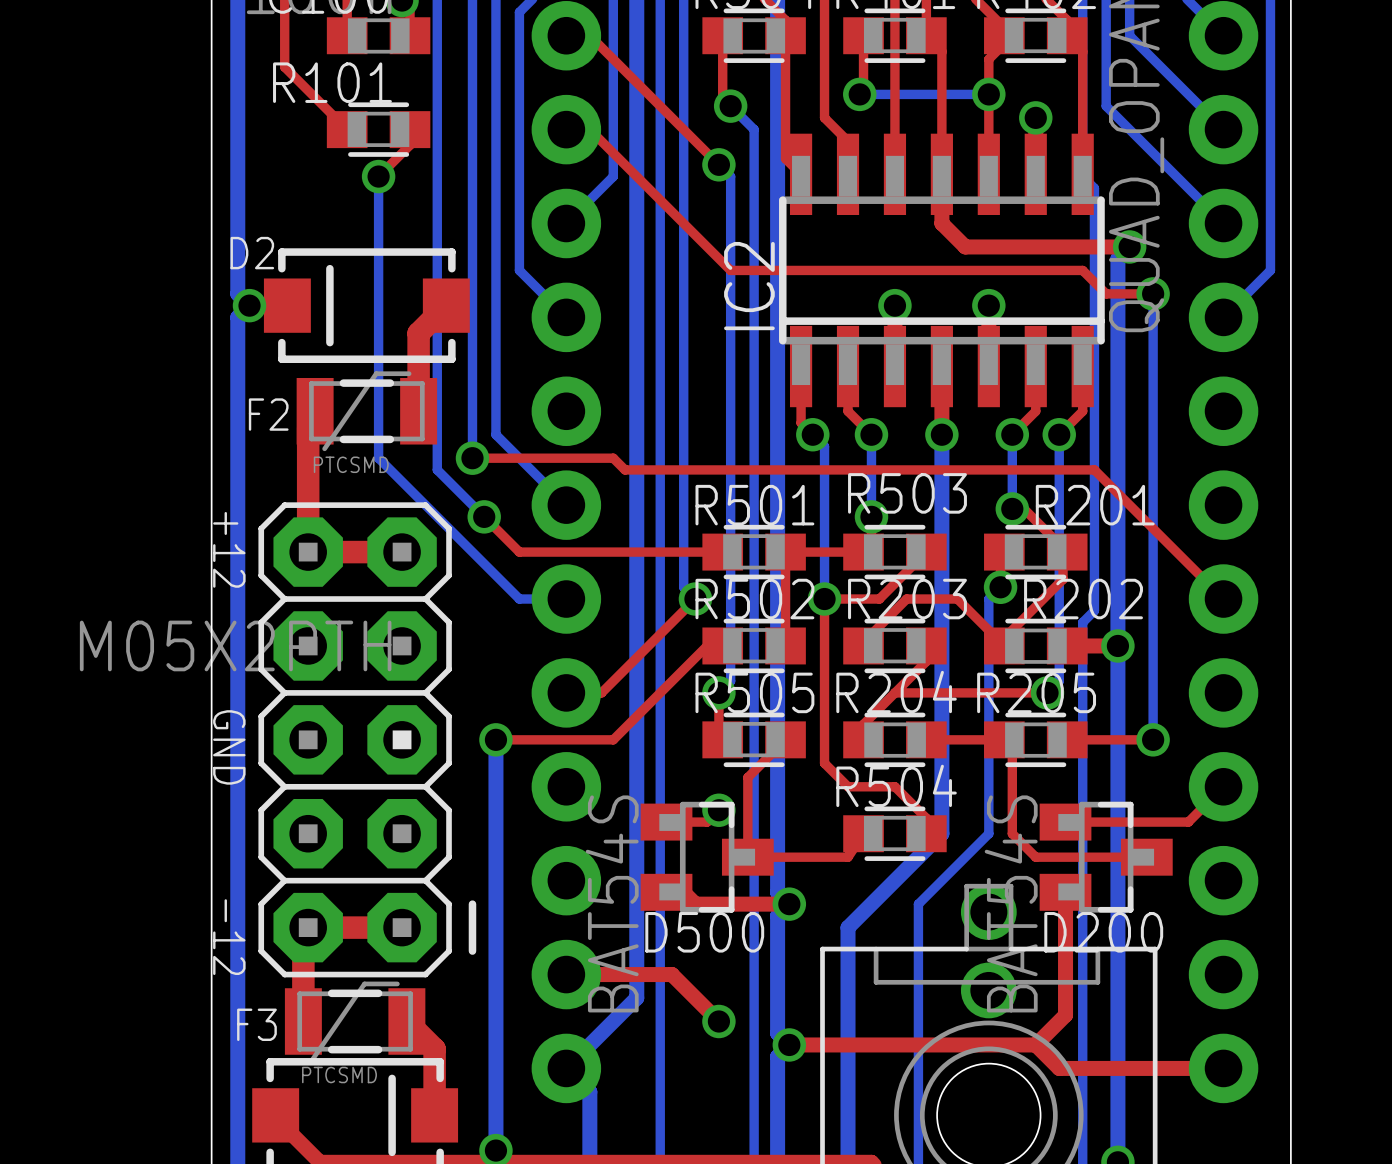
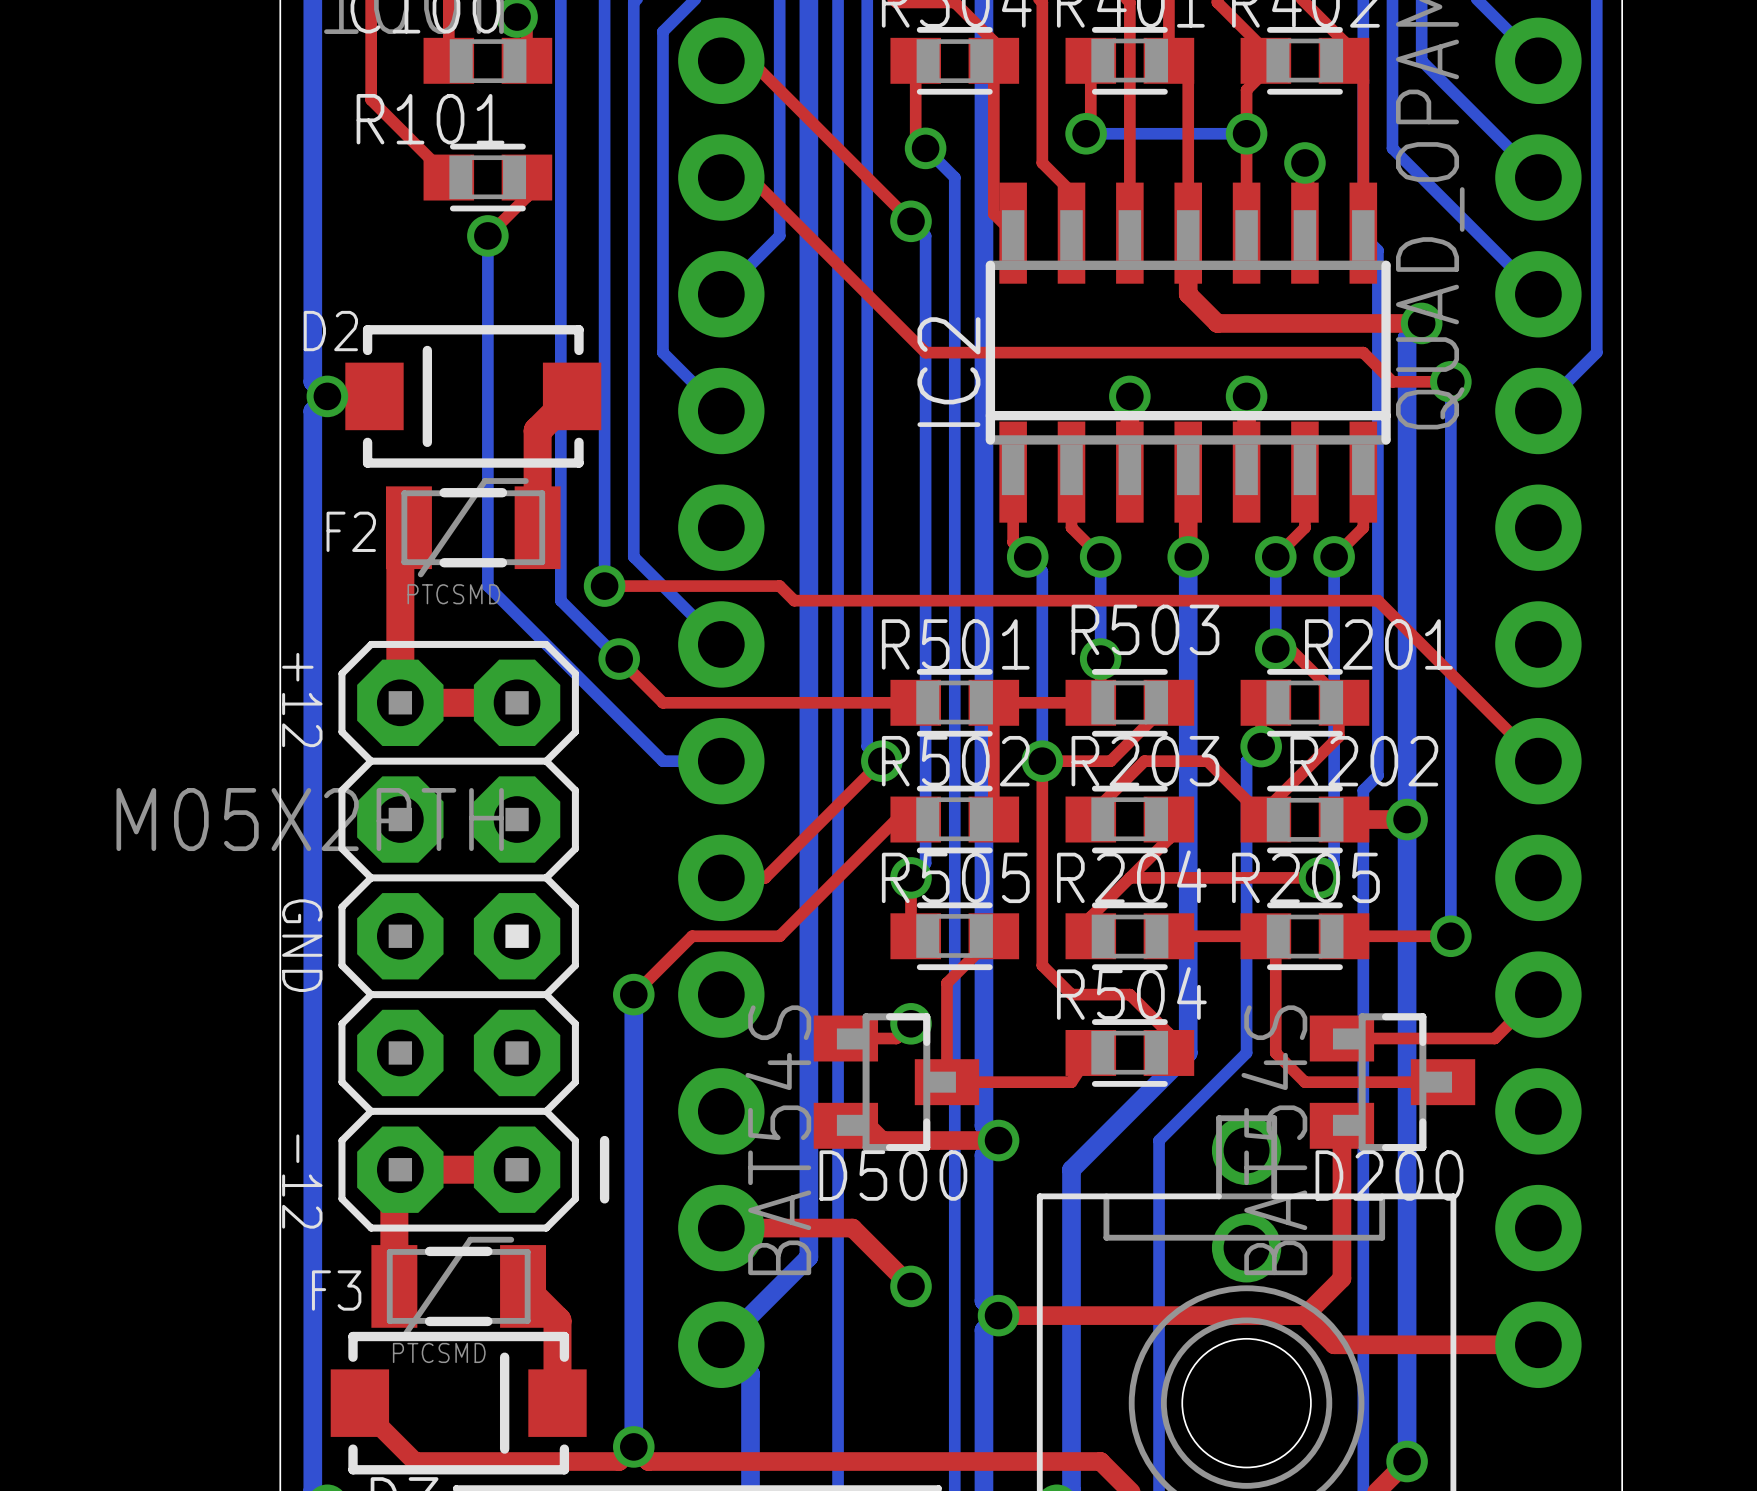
bottom track: (495, 739) (495, 786) -> none
top track: (495, 739) (542, 739) -> (633, 994) (692, 936)
via position: (495, 739) -> (633, 994)

